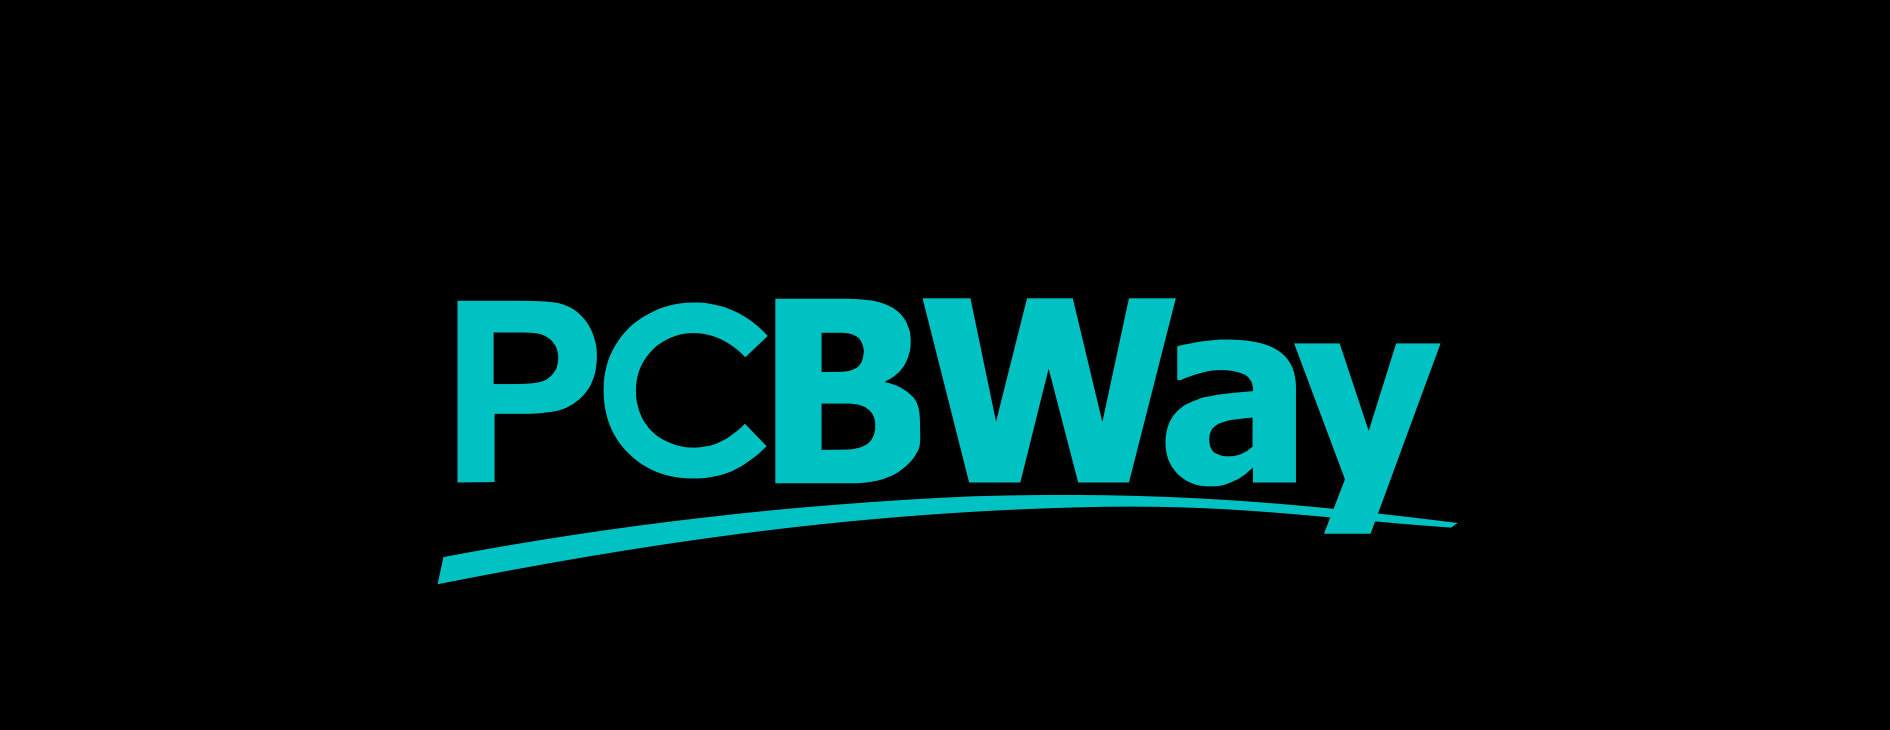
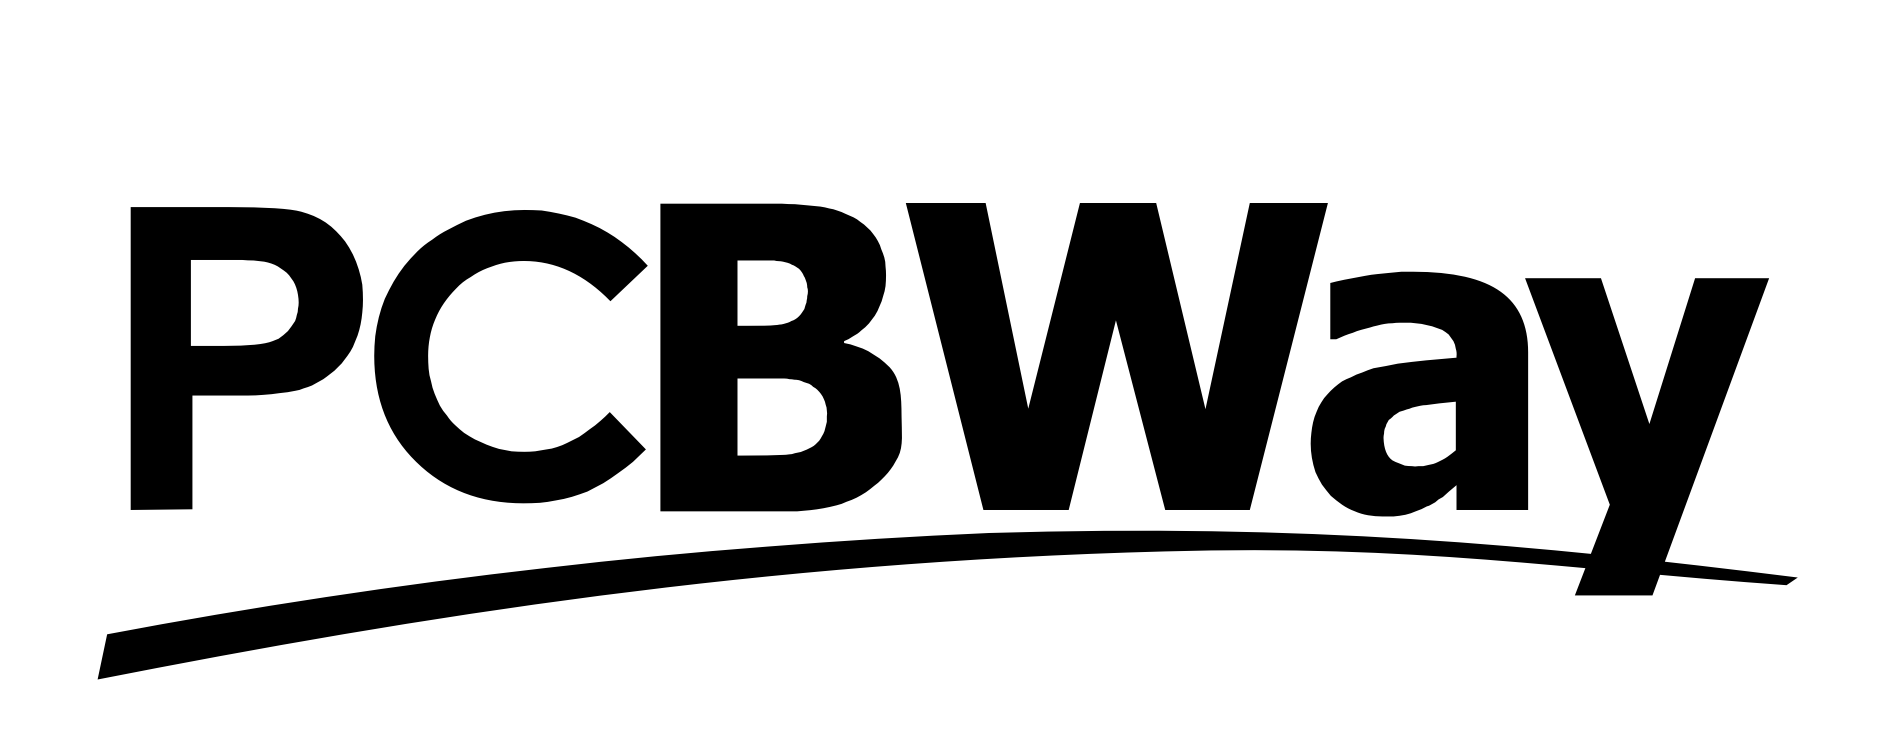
drawing shape: [437, 298, 1458, 585] -> [97, 203, 1798, 680]

